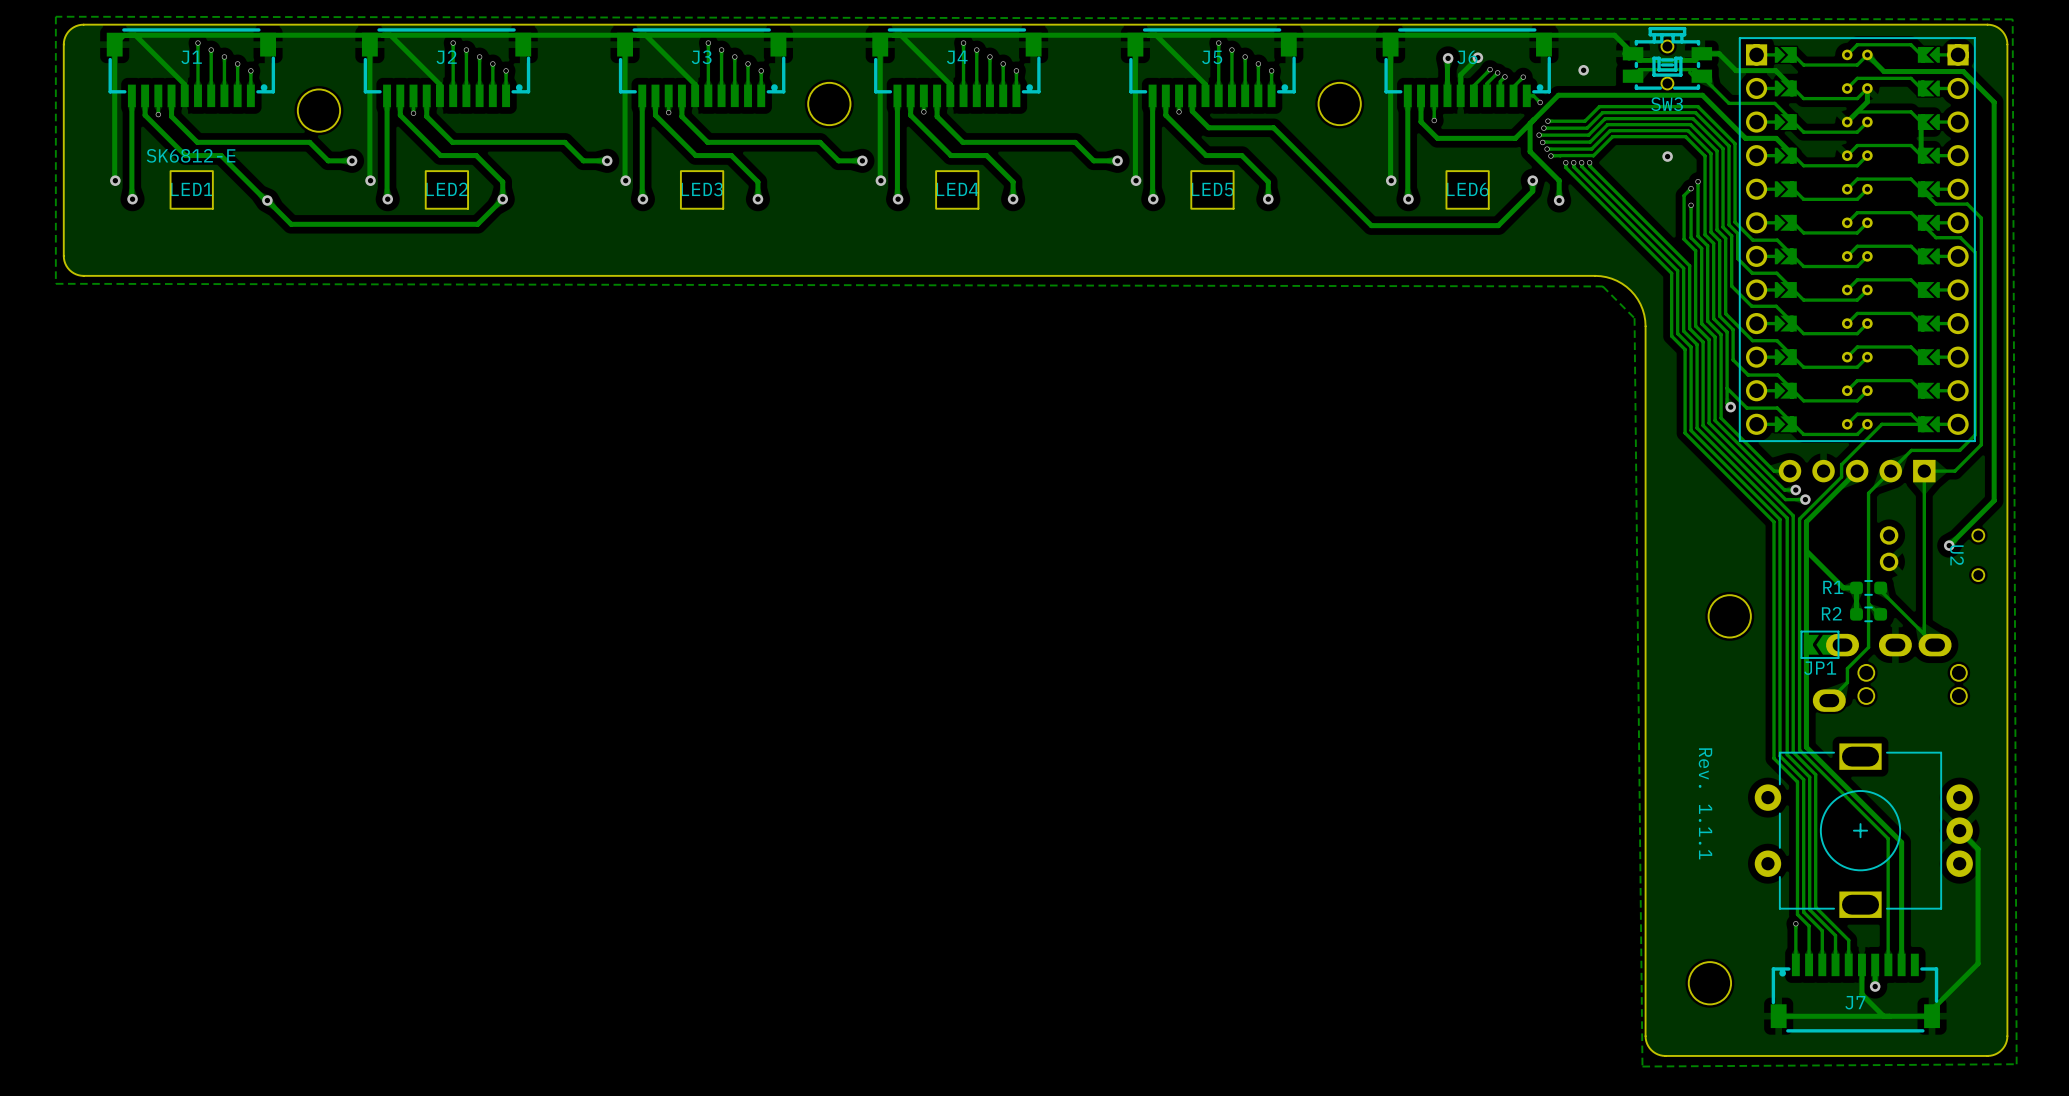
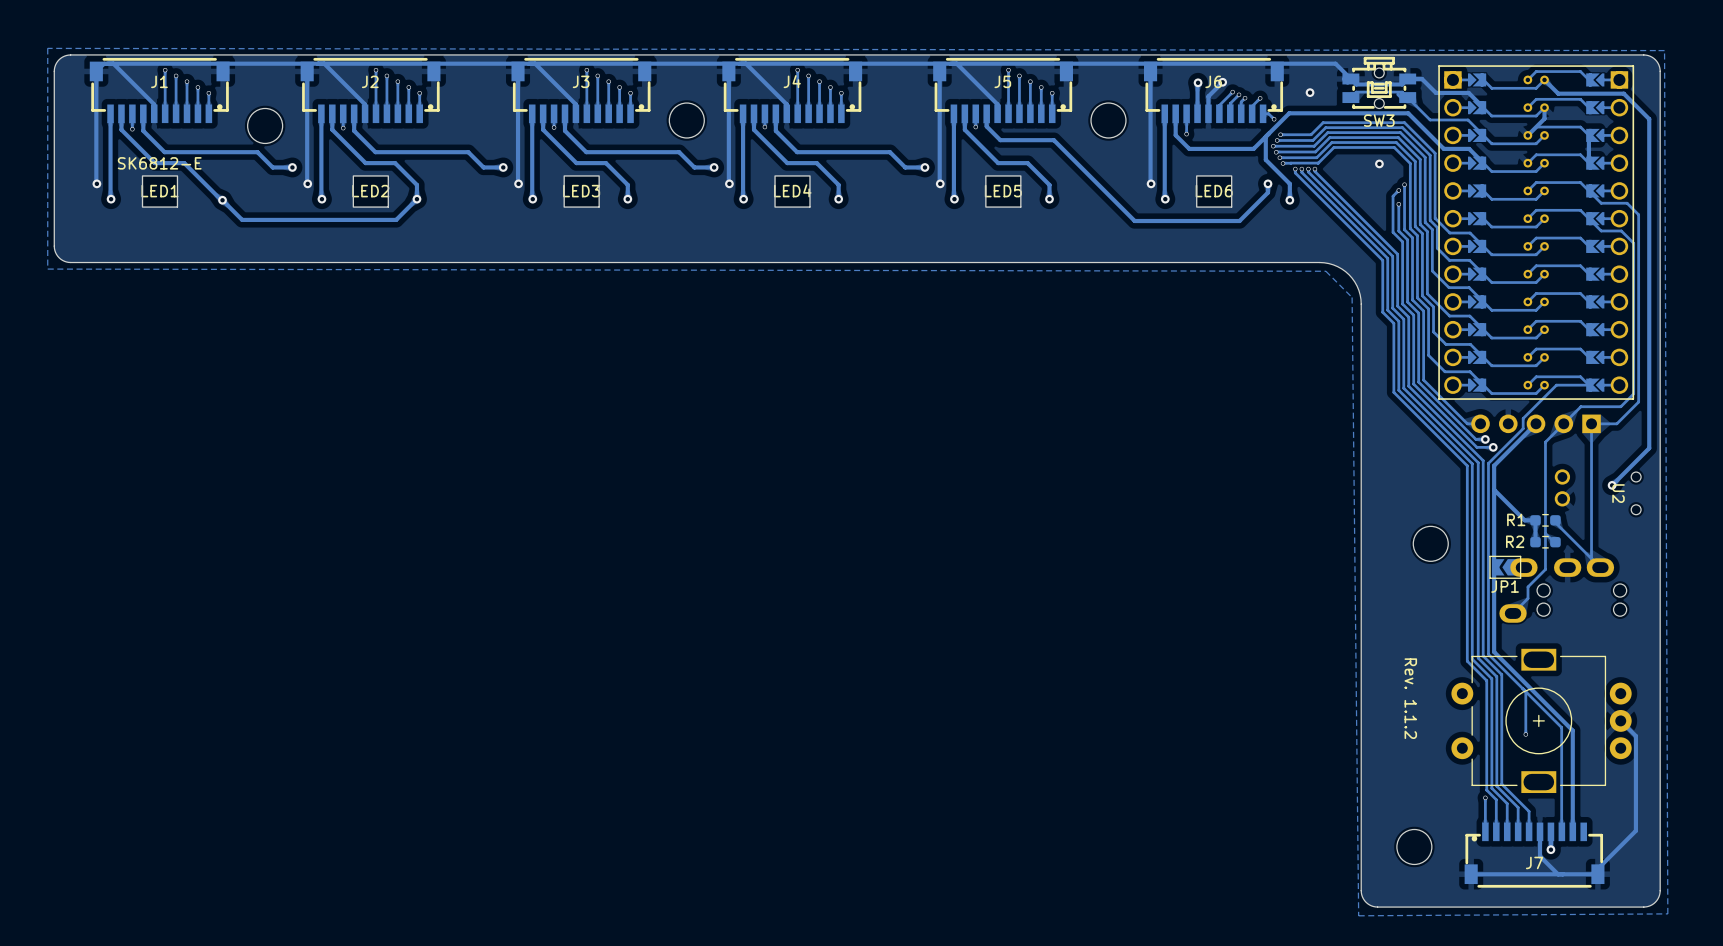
track: (1727, 388) (1727, 403) (1730, 407) -> none
via: (1730, 407) -> none
track: none -> (1525, 691) (1525, 734)
text: Rev. 1.1.1 (1705, 803) -> Rev. 1.1.2 (1410, 698)
via: none -> (1525, 734)

